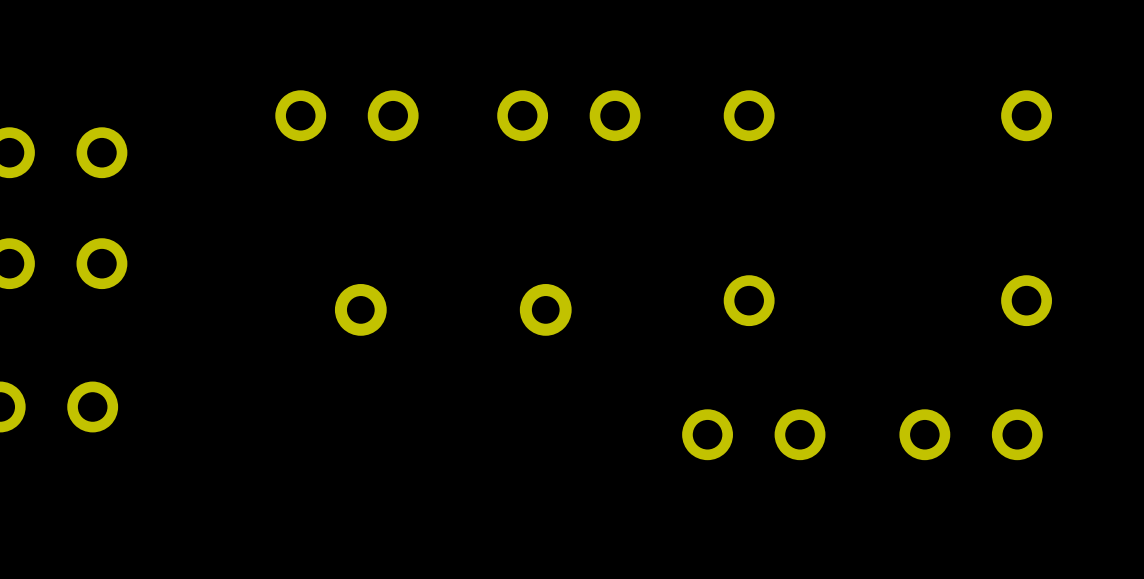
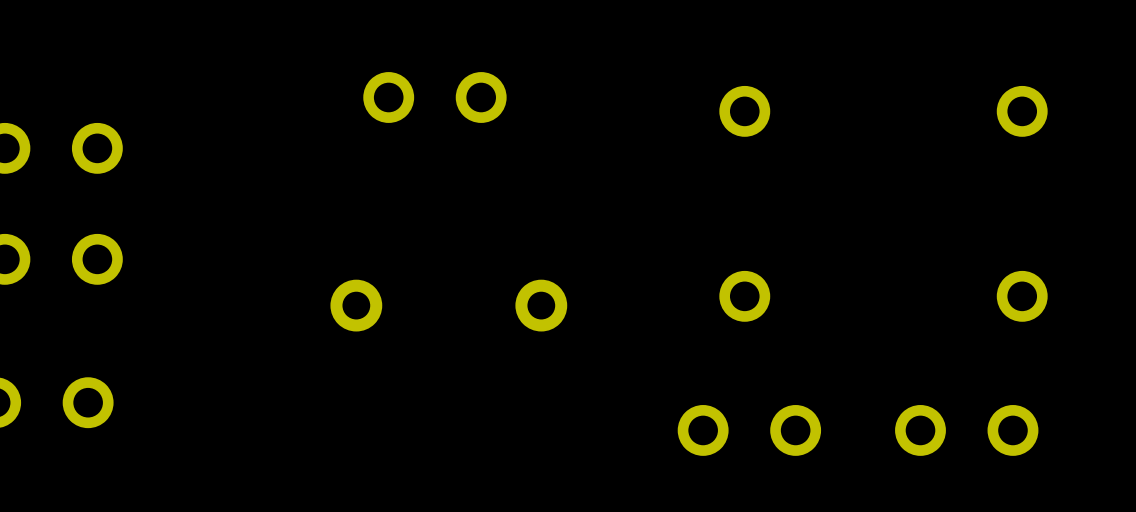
part: none -> (434, 97)
part: (346, 115) -> none
part: (568, 115) -> none

